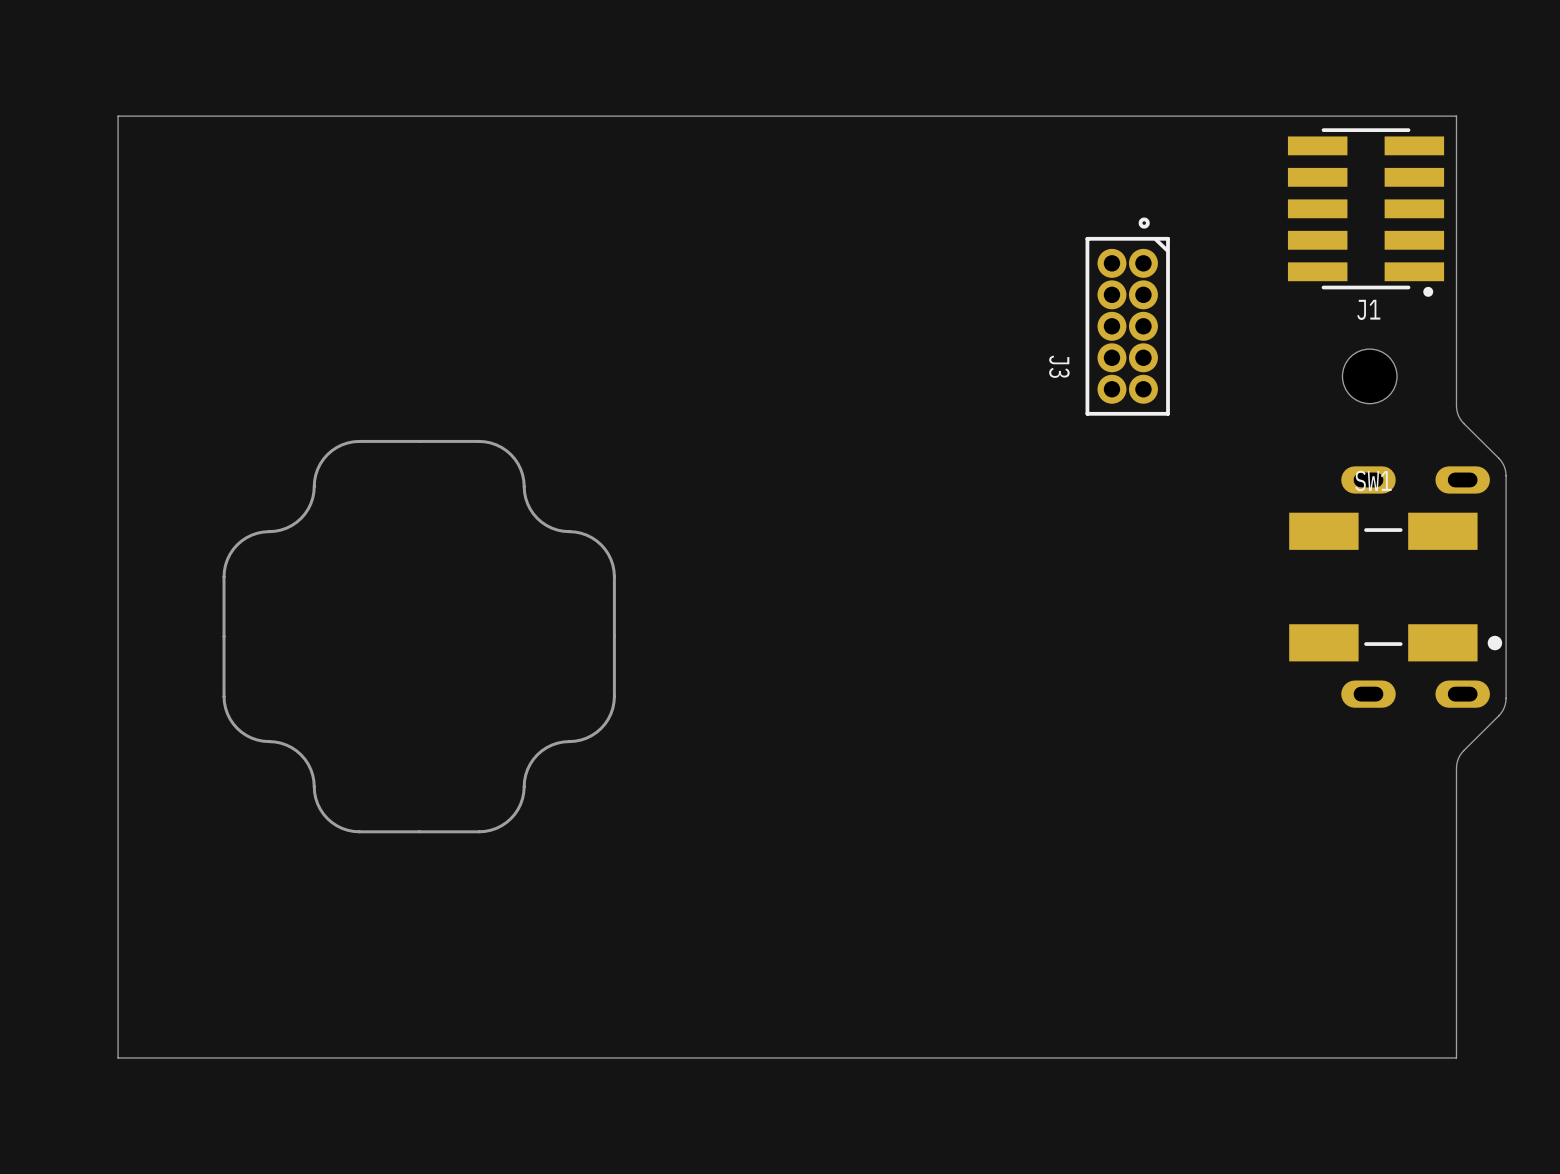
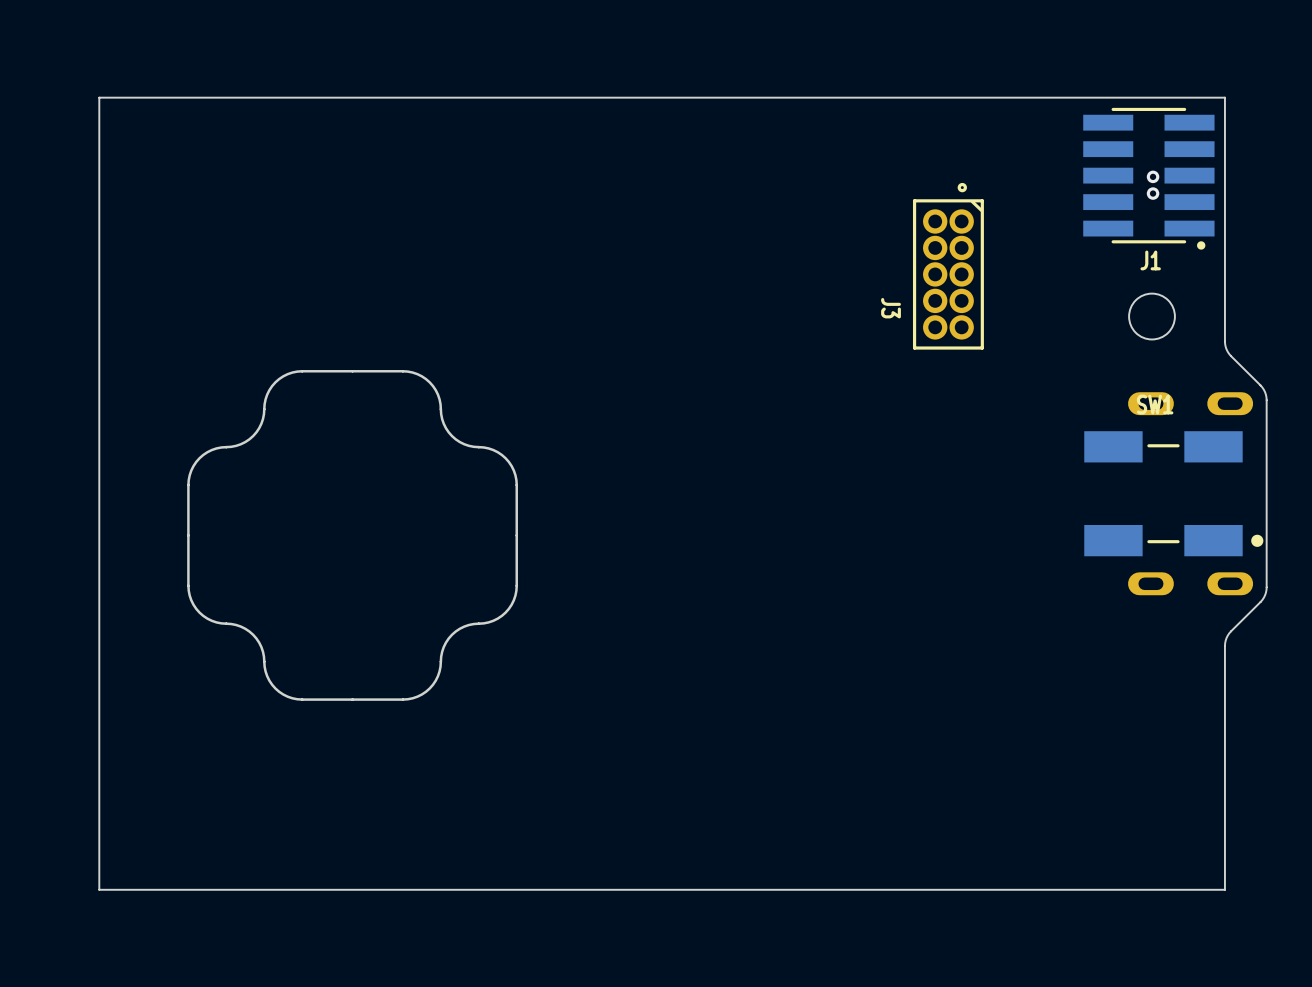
via: none -> (1153, 176)
via: none -> (1153, 193)

